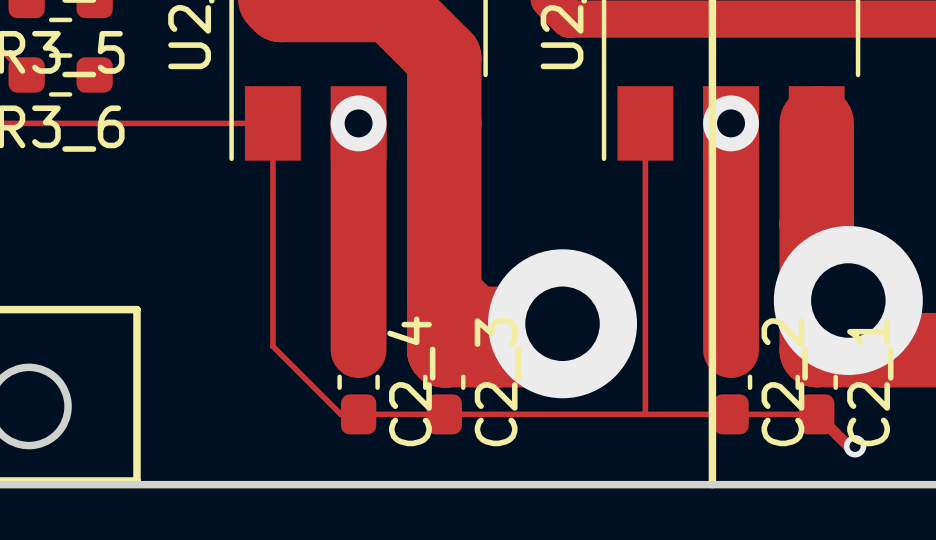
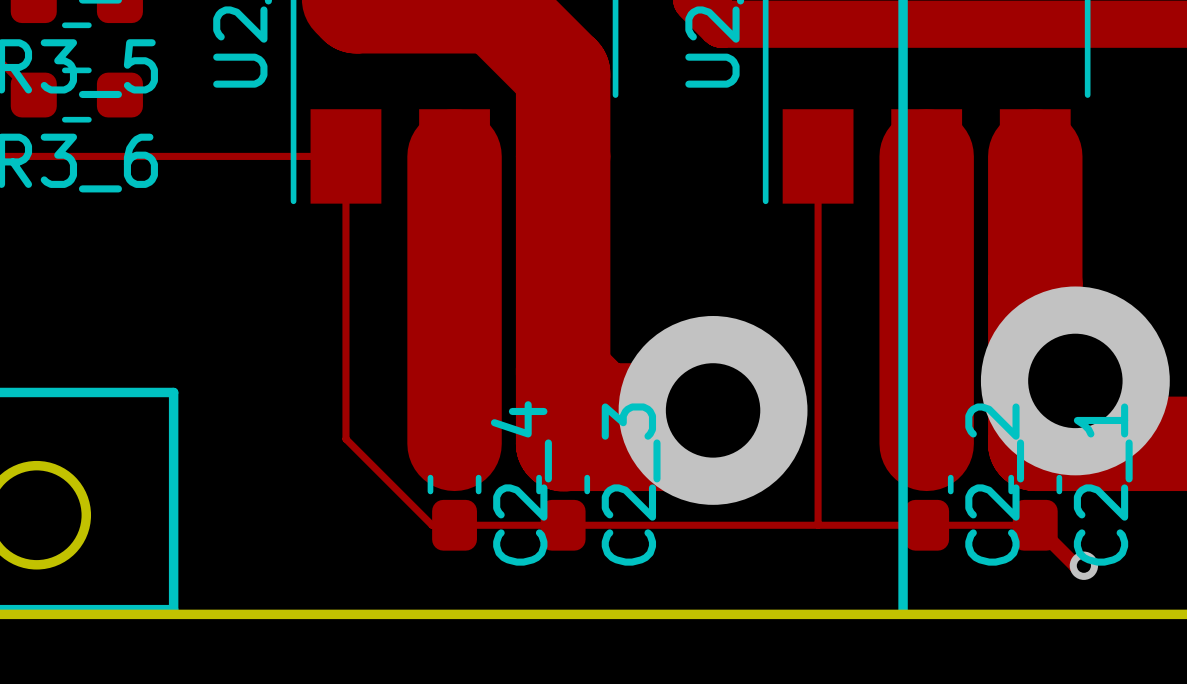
track width: thin (358, 123) (358, 350) -> thick (454, 156) (454, 443)
via: (358, 123) -> none
track width: thin (731, 123) (731, 350) -> thick (926, 156) (926, 443)
via: (731, 123) -> none

